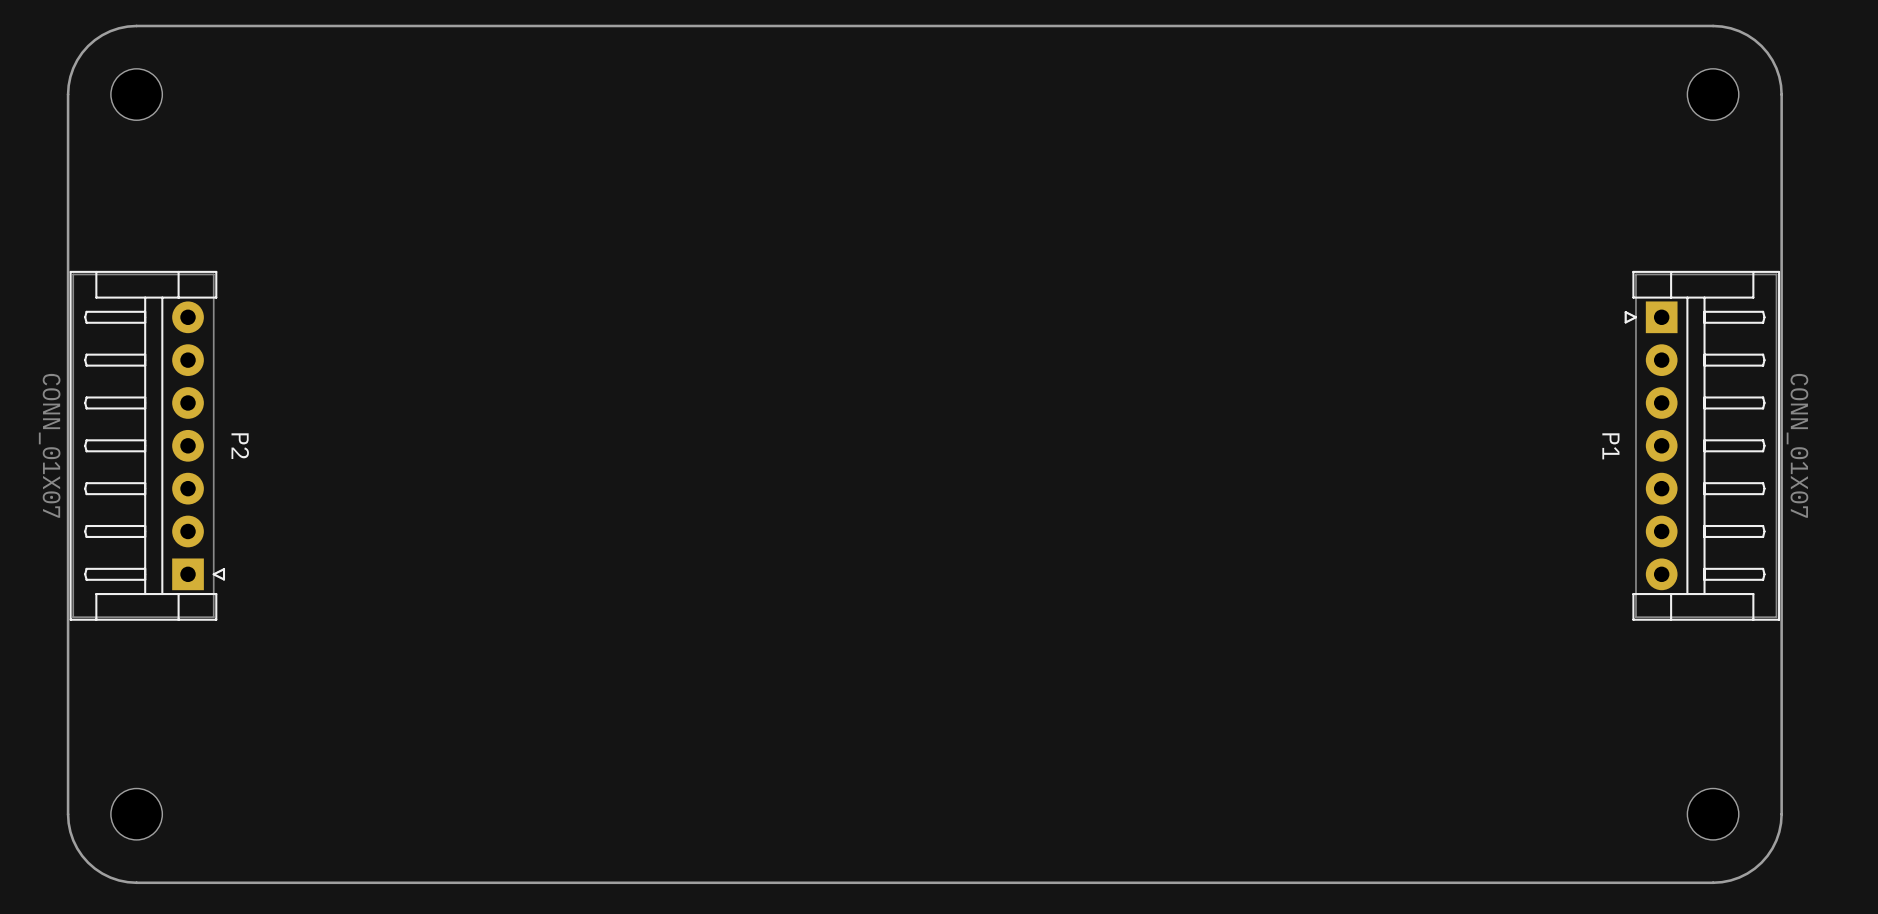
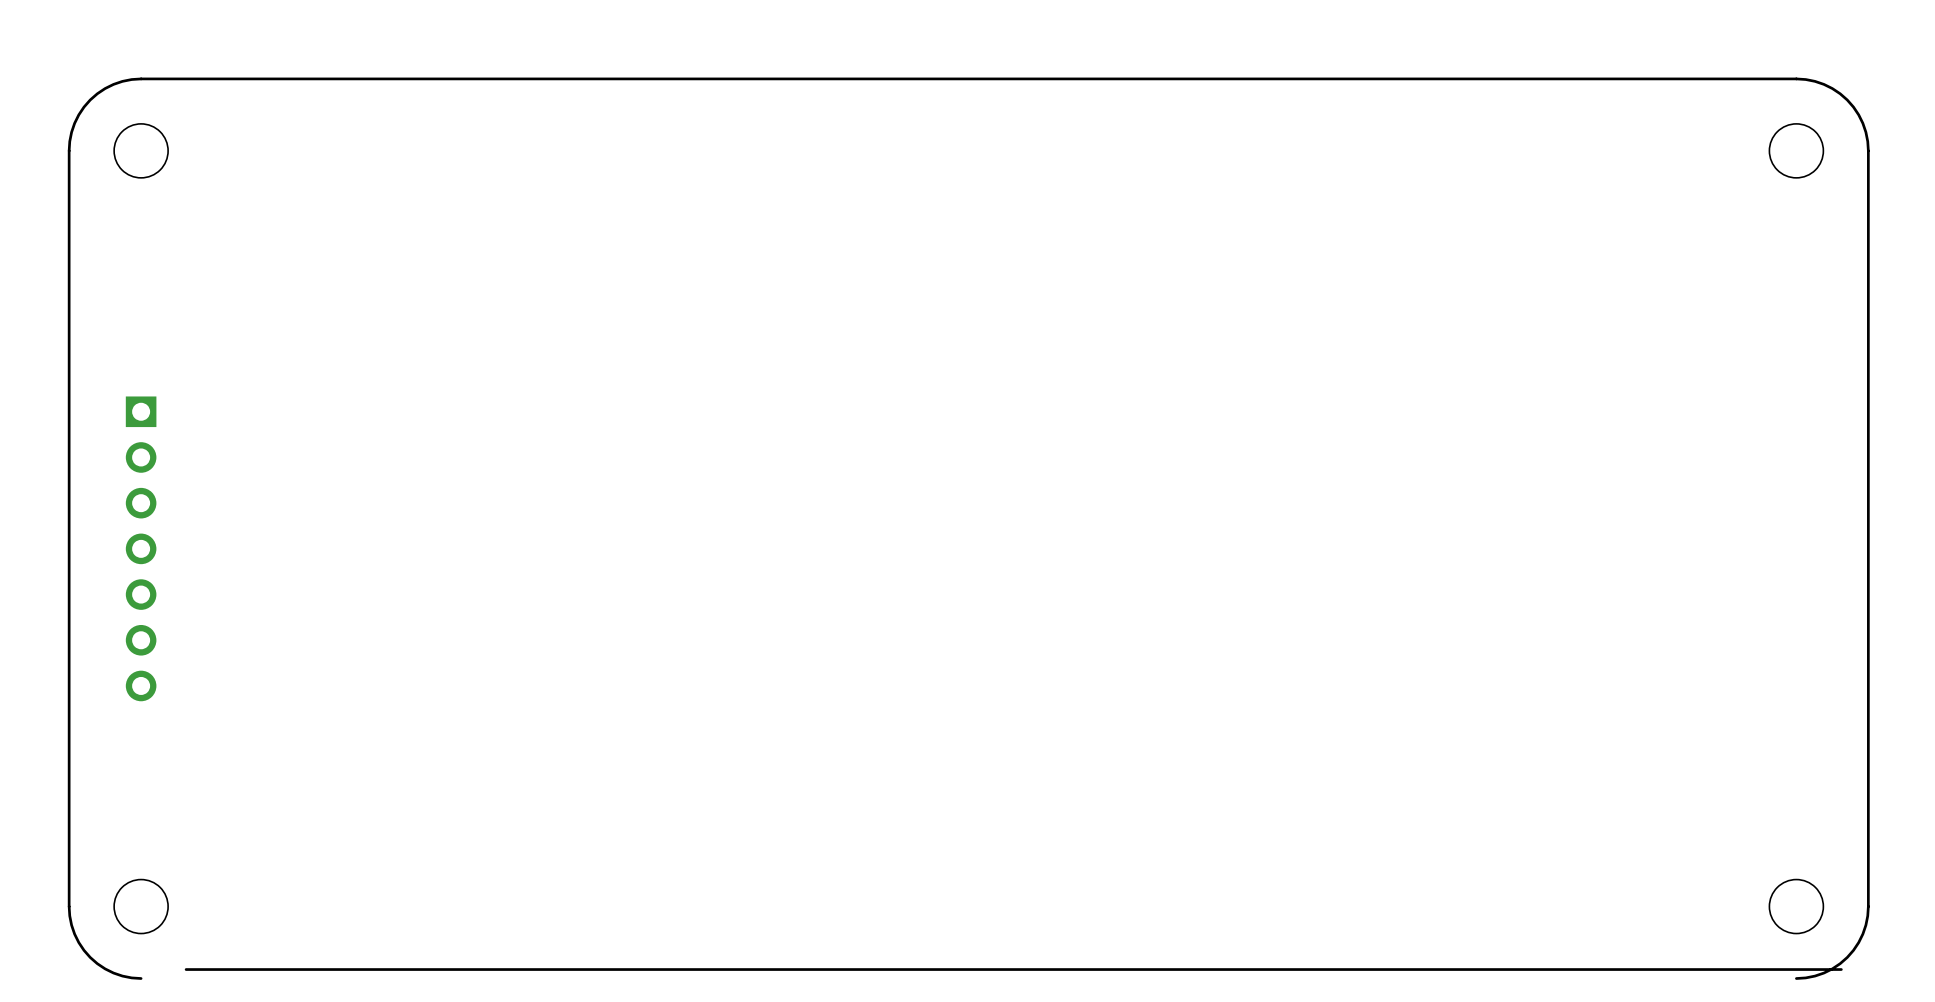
P2: CONN_01X07 (147, 445) -> none
P1: CONN_01X07 (1702, 445) -> none
part: none -> (141, 548)
board edge: (1713, 882) (136, 882) -> (1841, 969) (186, 969)

